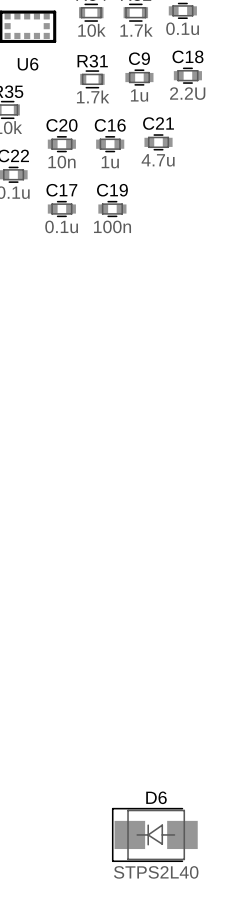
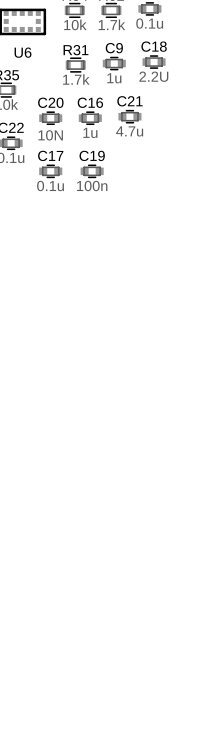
C20 value: 10n (61, 162) -> 10N (50, 135)
D6: STPS2L40 (154, 834) -> none

